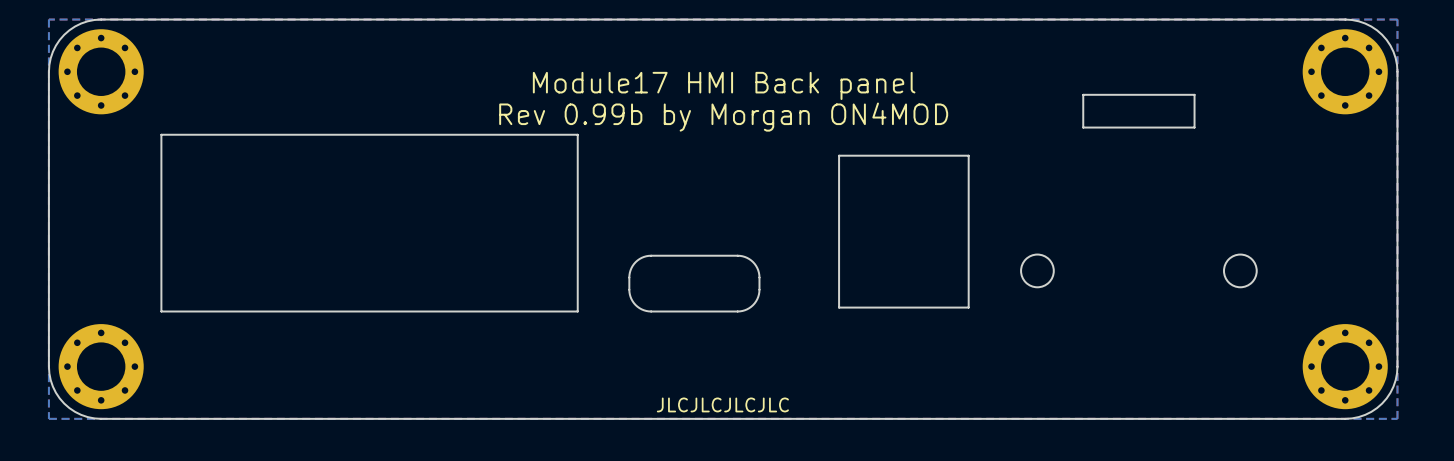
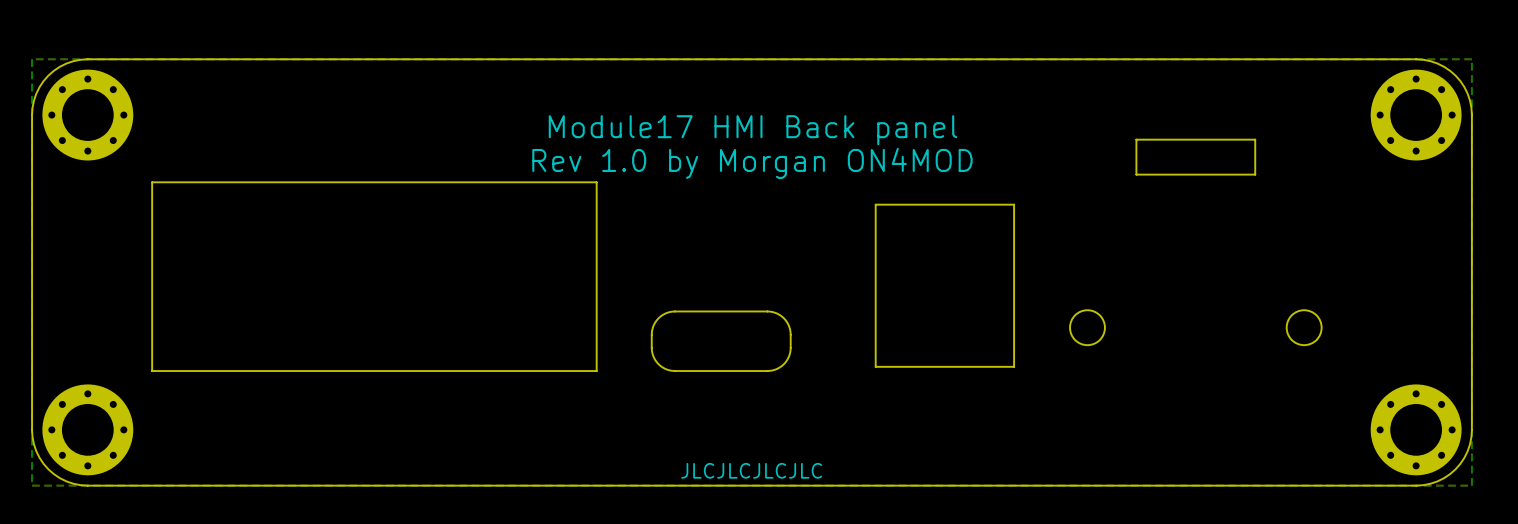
text: Rev 0.99b by Morgan ON4MOD (723, 117) -> Rev 1.0 by Morgan ON4MOD (752, 163)

